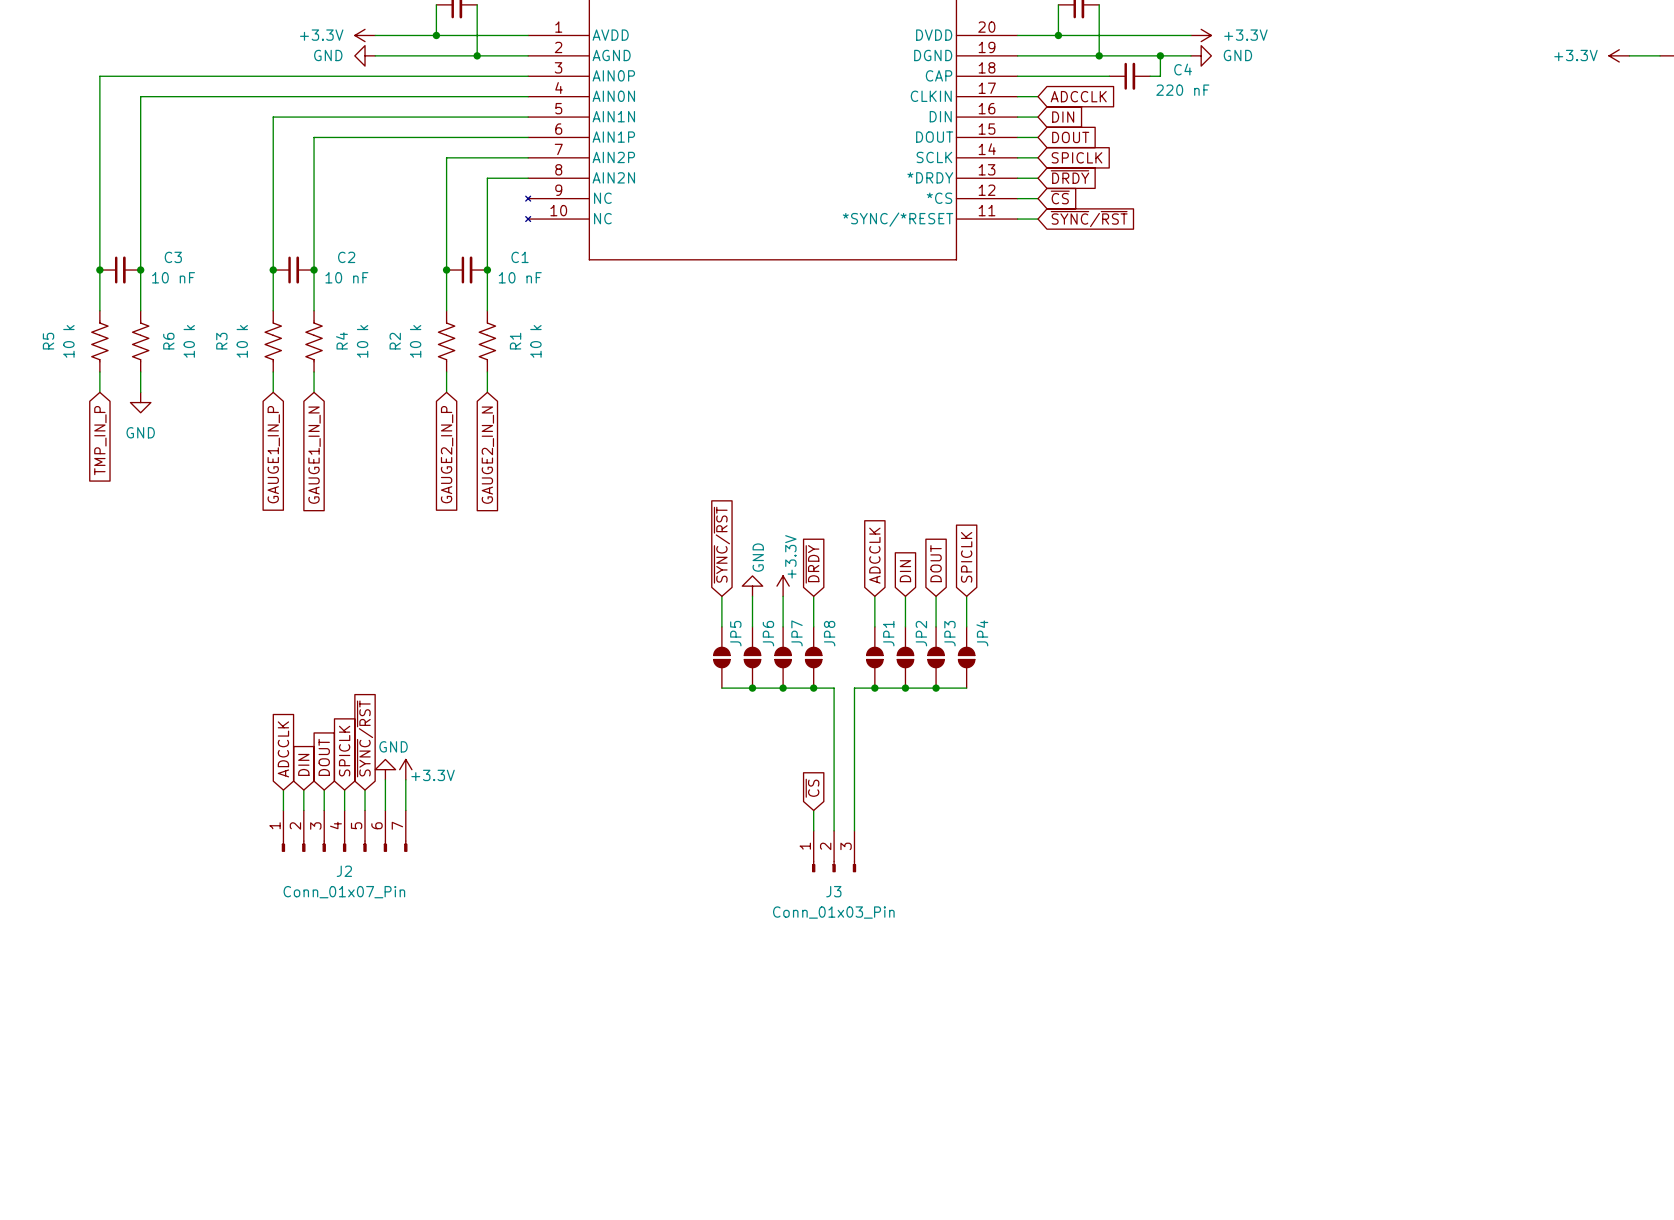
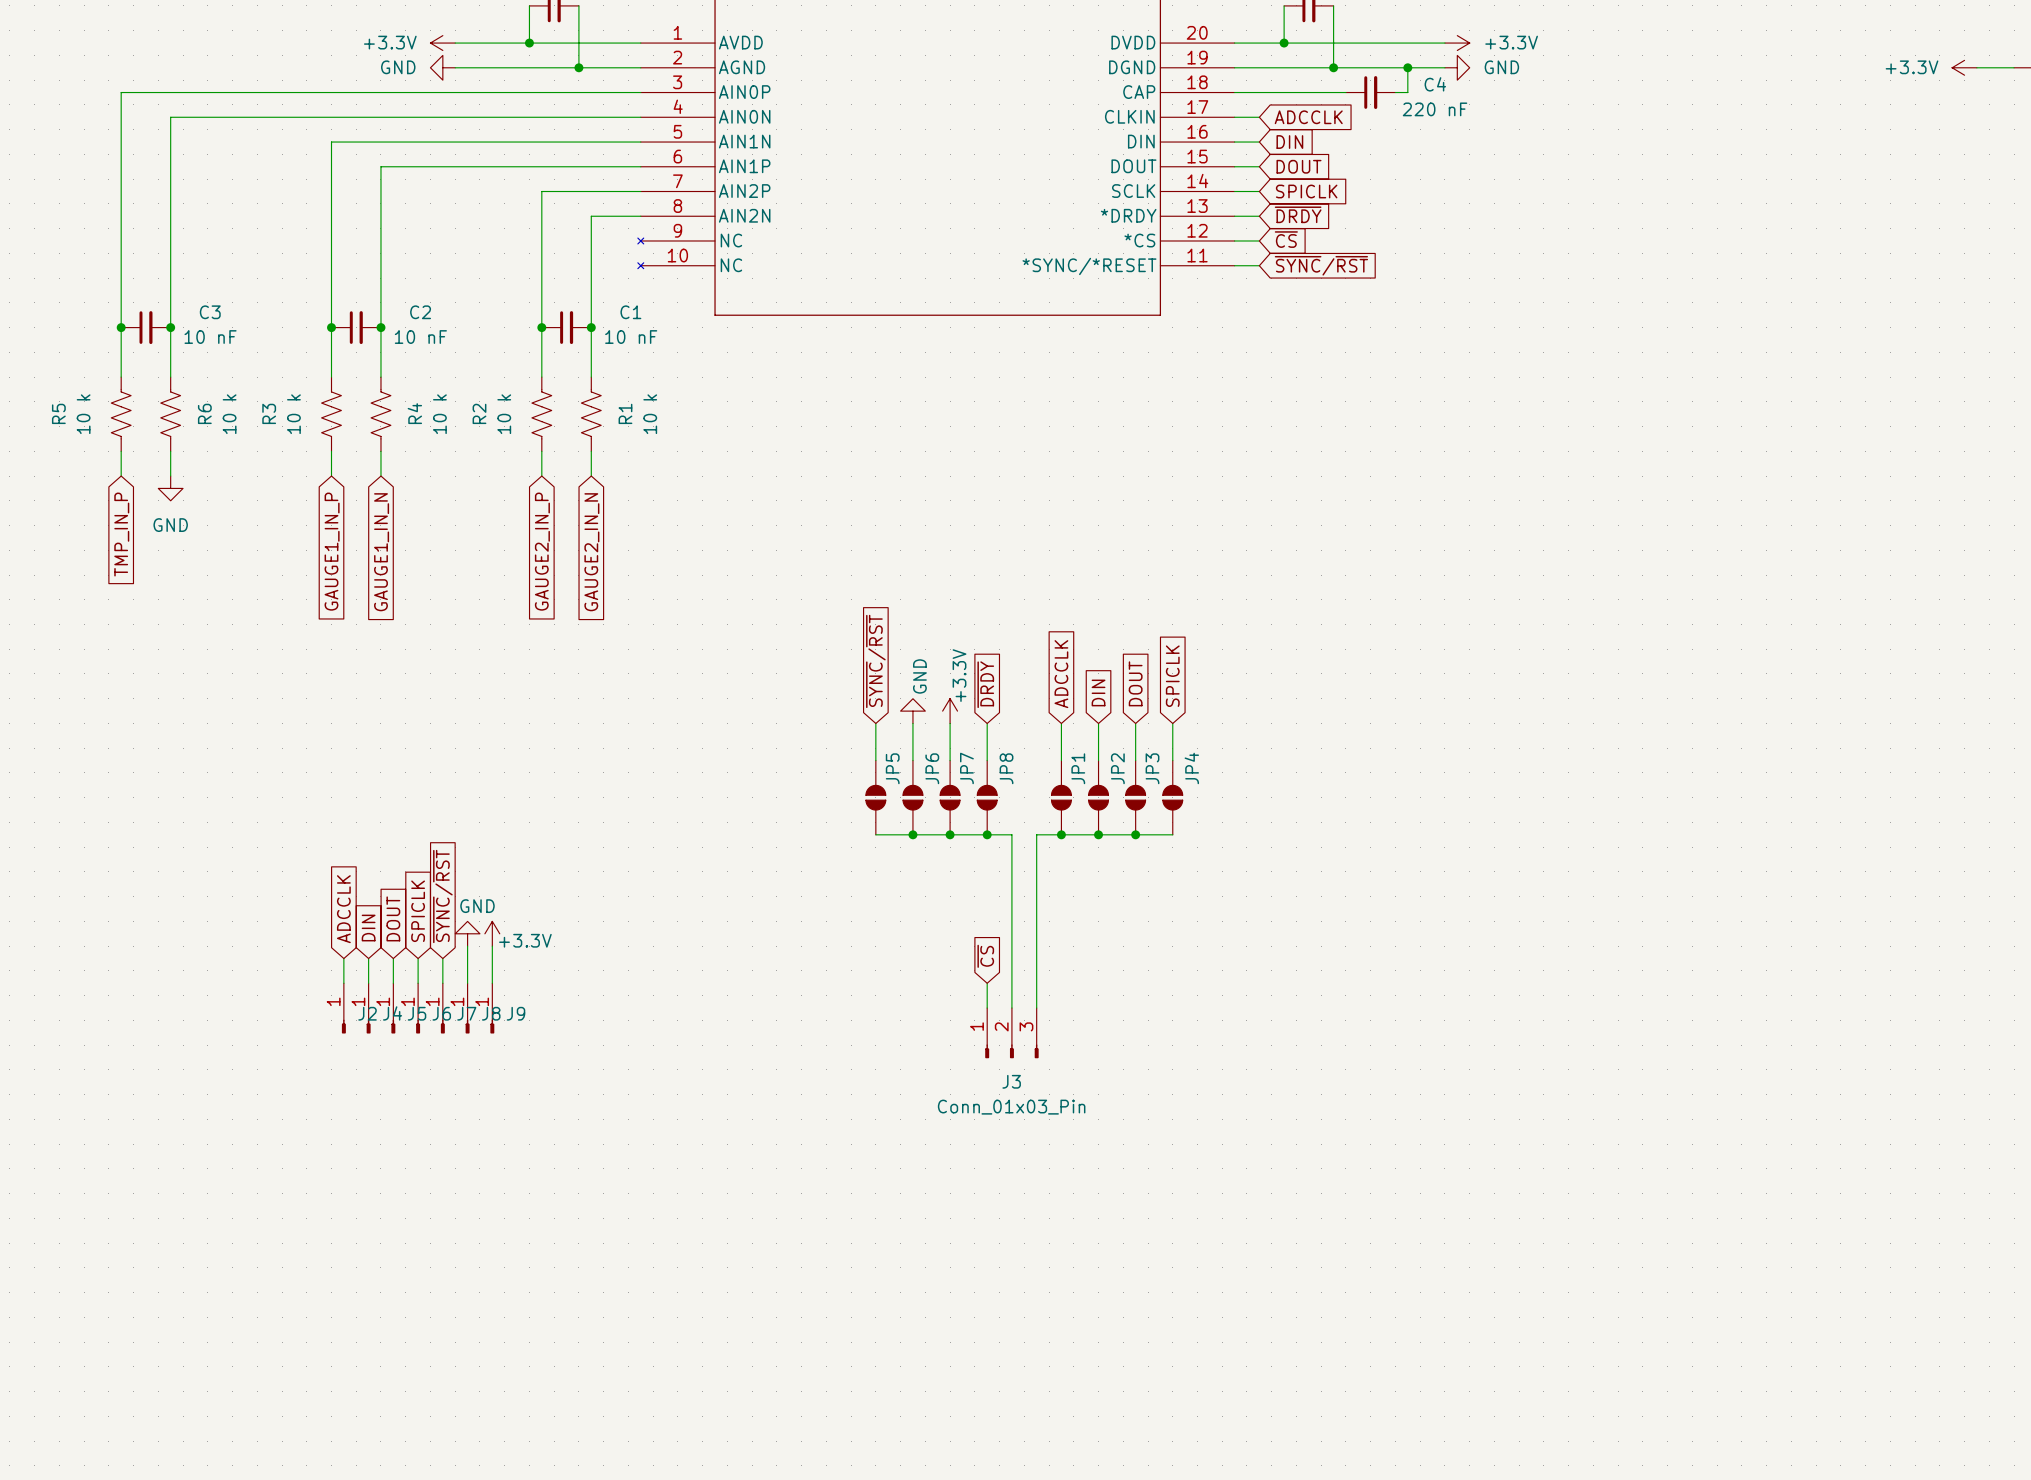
J2 symbol: [281, 810, 408, 852] -> [341, 983, 346, 1034]
J4: none -> (368, 1008)
J5: none -> (393, 1008)
J6: none -> (418, 1008)
J7: none -> (442, 1008)
J8: none -> (467, 1008)
J9: none -> (492, 1008)
J2 name position: J2 (344, 871) -> J2 (367, 1013)
J2 value: Conn_01x07_Pin (344, 892) -> none

